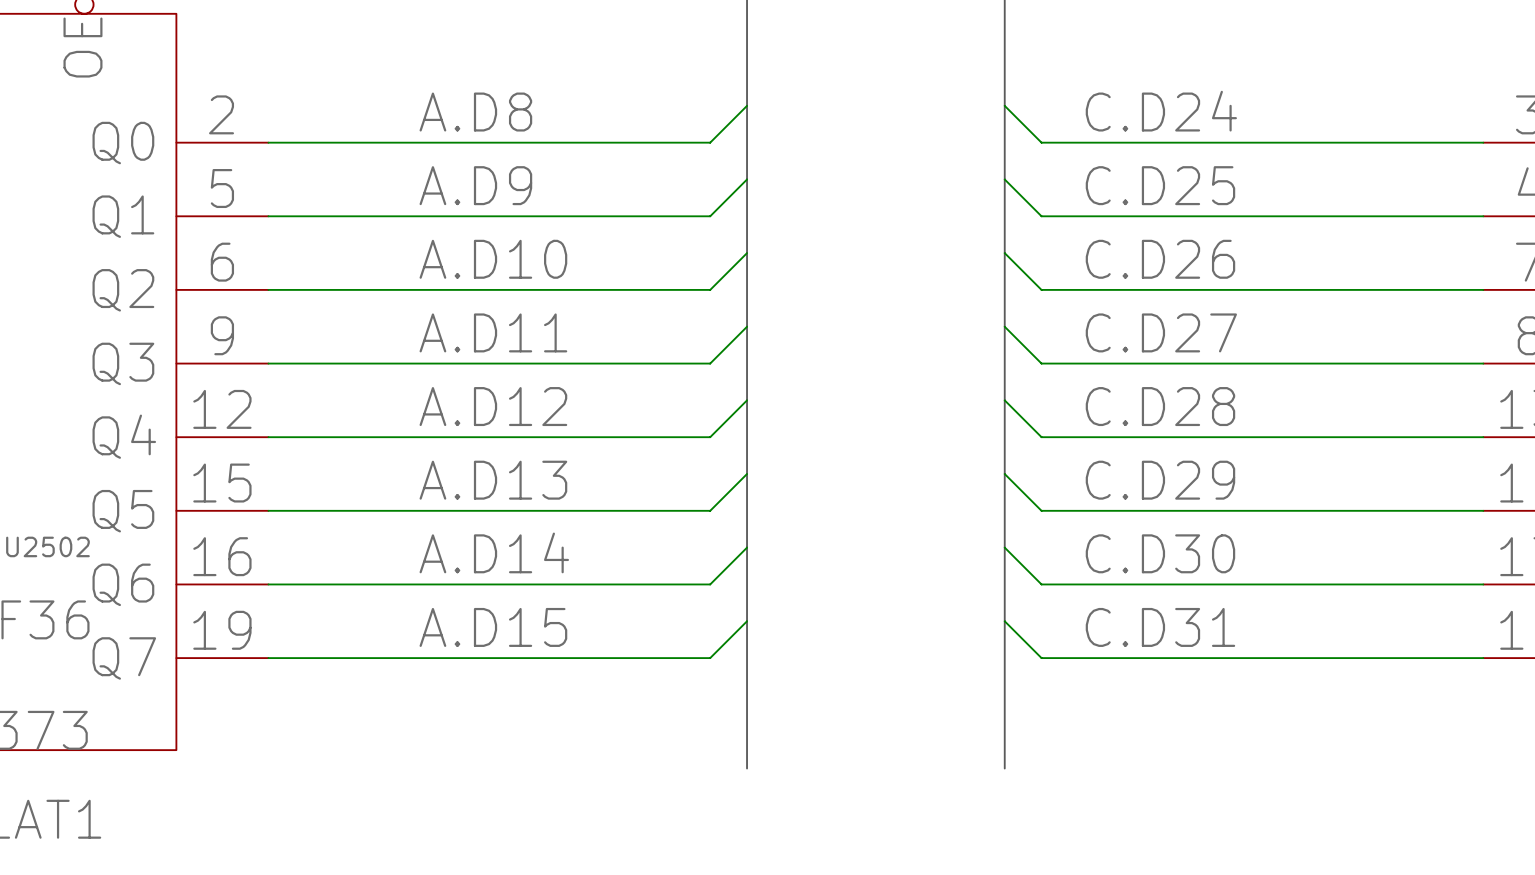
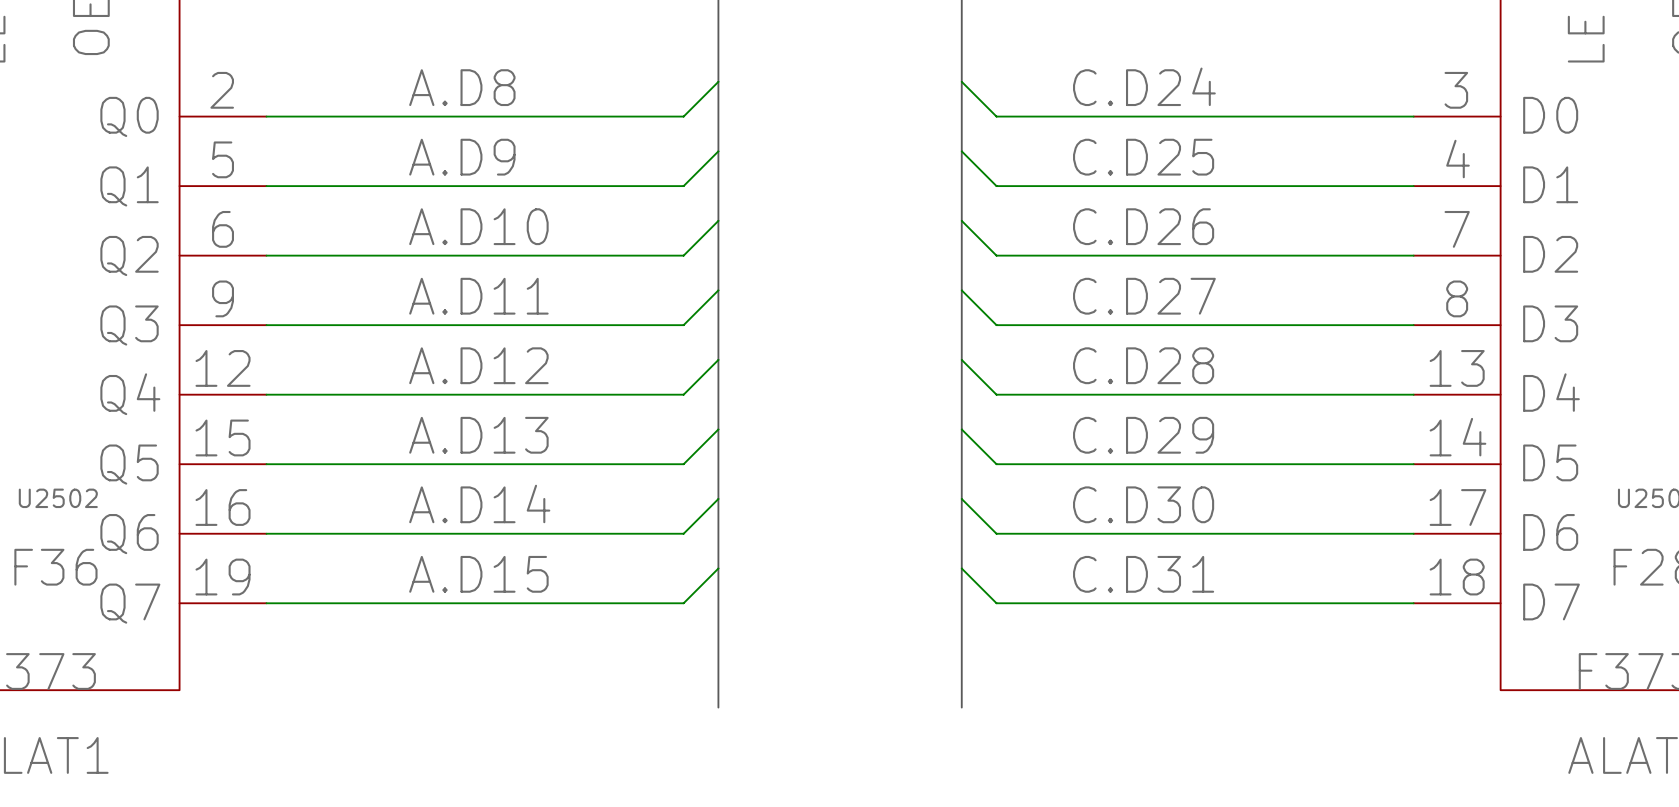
label position: C.D24 (1161, 111) -> C.D24 (1144, 86)
label position: C.D25 (1160, 185) -> C.D25 (1143, 157)
label position: C.D26 (1160, 259) -> C.D26 (1143, 226)
label position: C.D27 (1161, 332) -> C.D27 (1144, 296)
label position: C.D28 (1160, 406) -> C.D28 (1143, 365)
label position: C.D29 (1160, 480) -> C.D29 (1143, 435)
label position: C.D30 (1160, 553) -> C.D30 (1143, 504)
label position: C.D31 (1160, 627) -> C.D31 (1143, 574)

